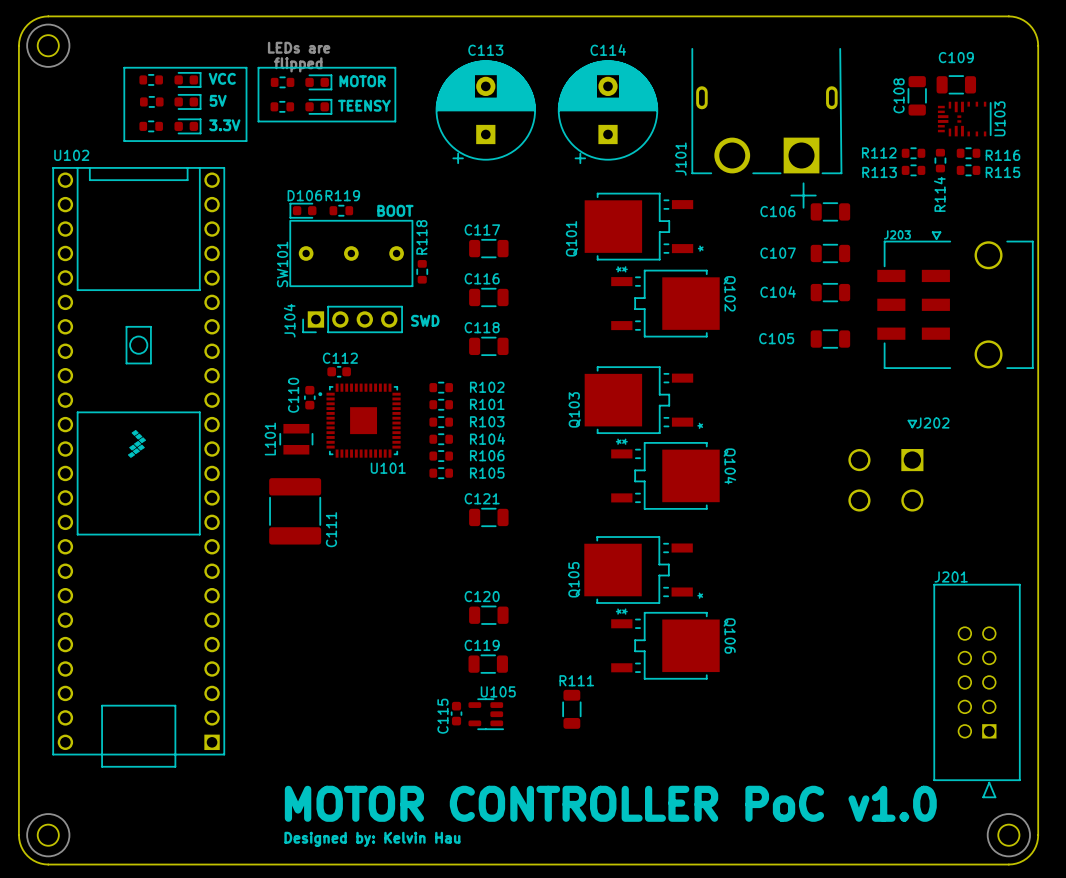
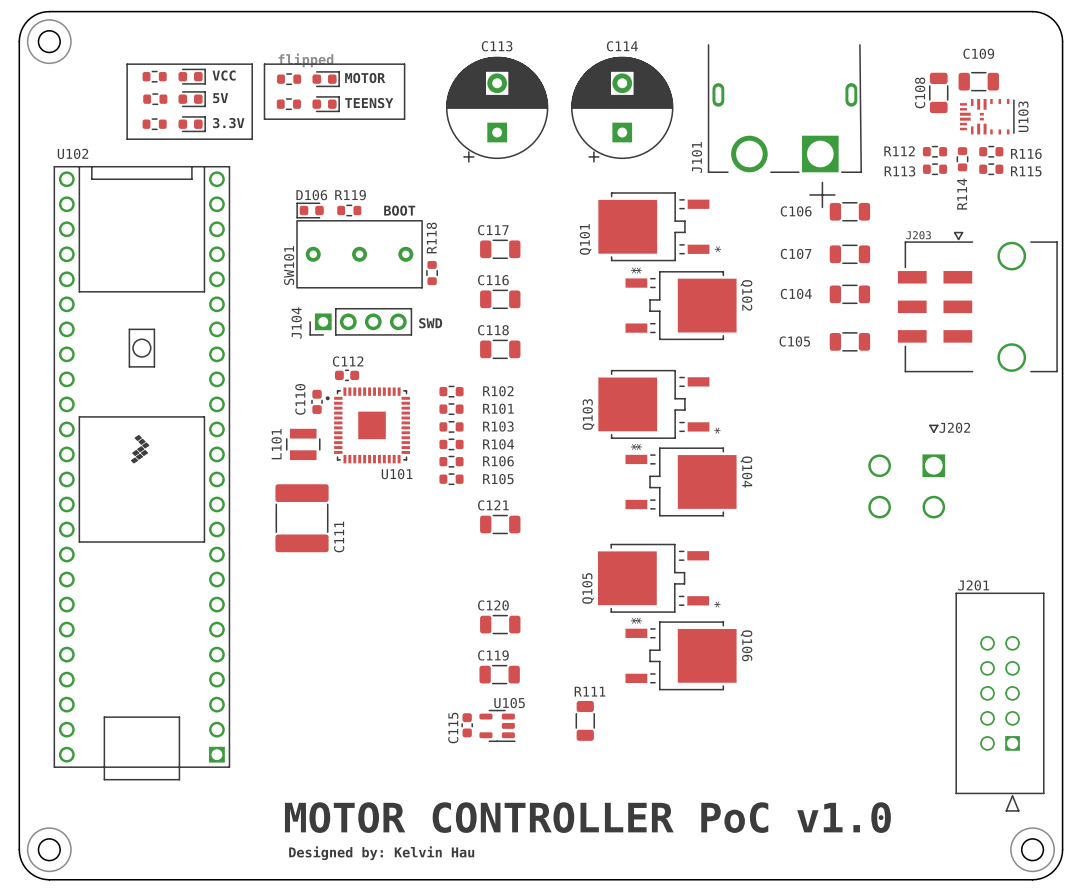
text: LEDs are (299, 47) -> none

